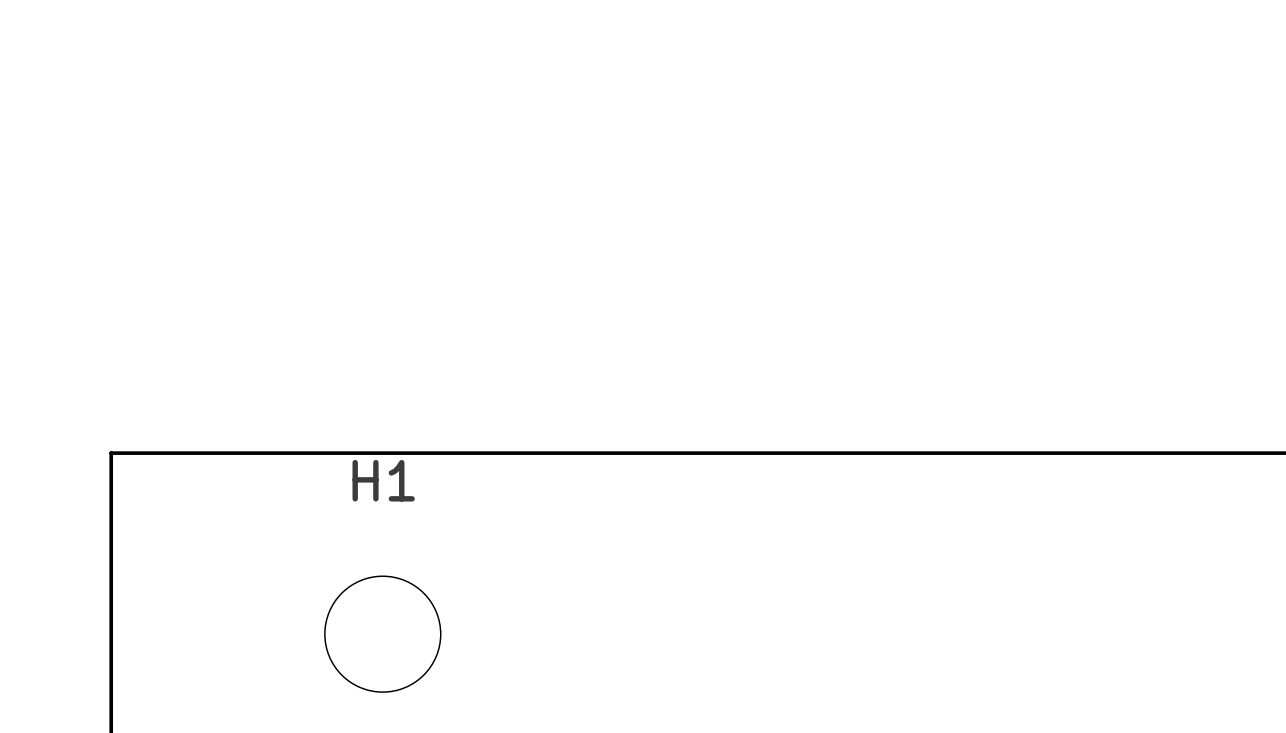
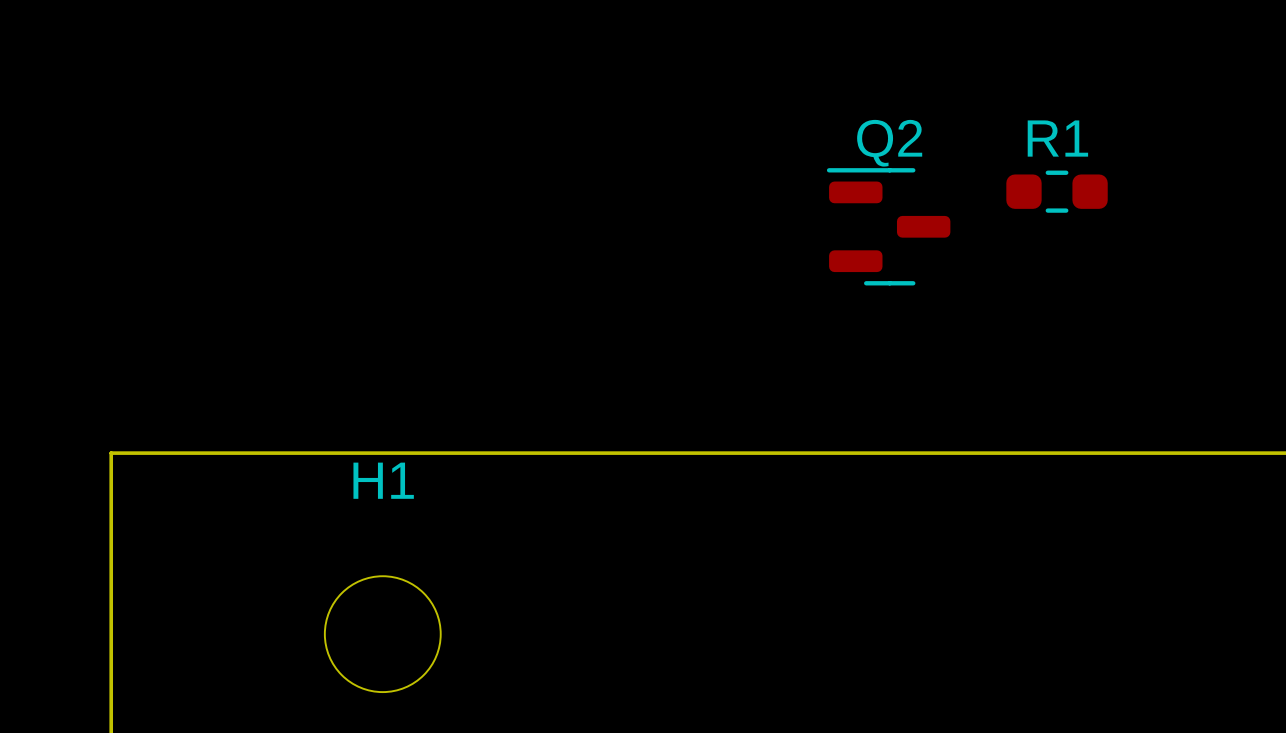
R1: none -> (1057, 191)
Q2: none -> (888, 226)

